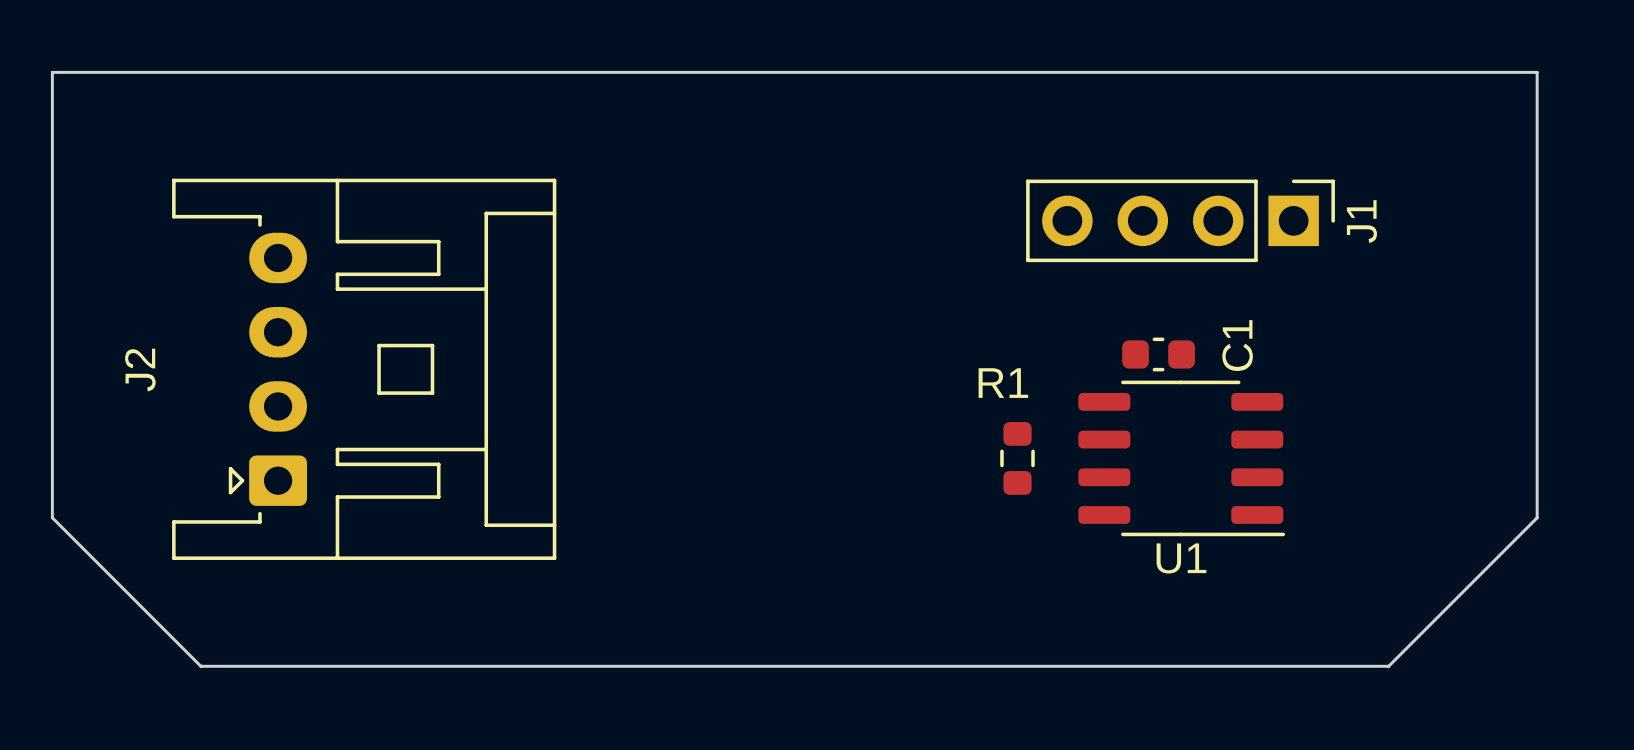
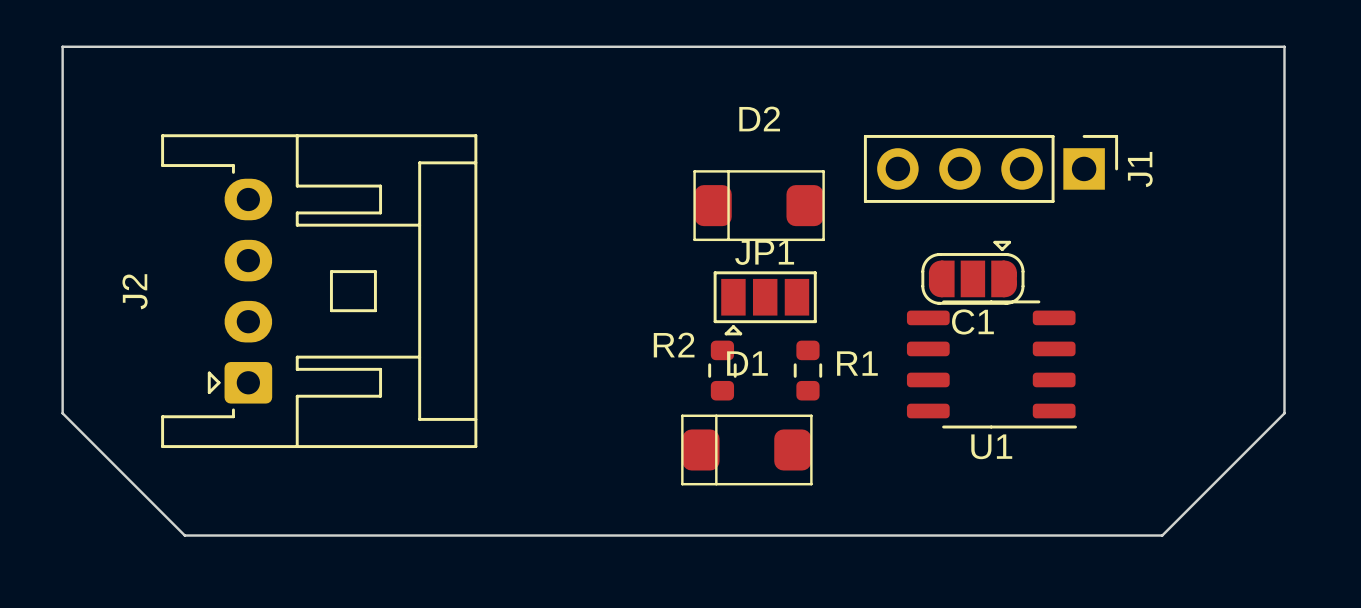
D2: none -> (759, 205)
C1 footprint: [1122, 337, 1195, 372] -> [921, 240, 1025, 305]
C1 name position: C1 (1237, 345) -> C1 (972, 321)
R1 name position: R1 (1003, 383) -> R1 (857, 363)
JP1: none -> (765, 303)
R1 position: (1017, 458) -> (807, 370)
R2: none -> (722, 370)
D1: none -> (746, 449)

